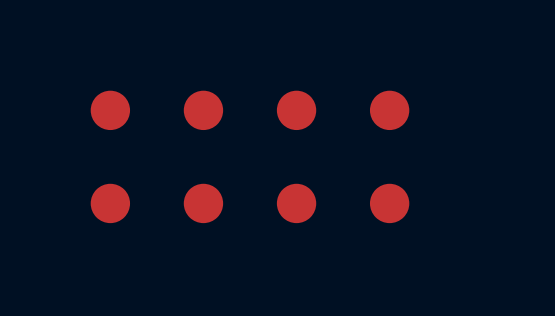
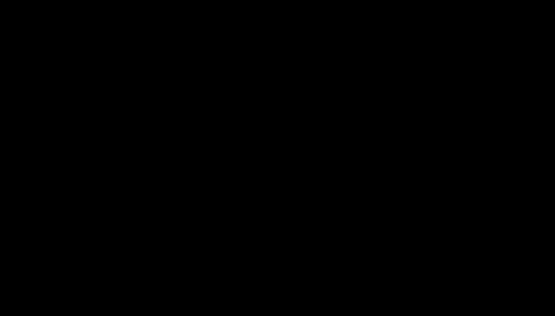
part: (110, 110) -> none
part: (203, 110) -> none
part: (296, 110) -> none
part: (389, 110) -> none
part: (110, 203) -> none
part: (203, 203) -> none
part: (296, 203) -> none
part: (389, 203) -> none

